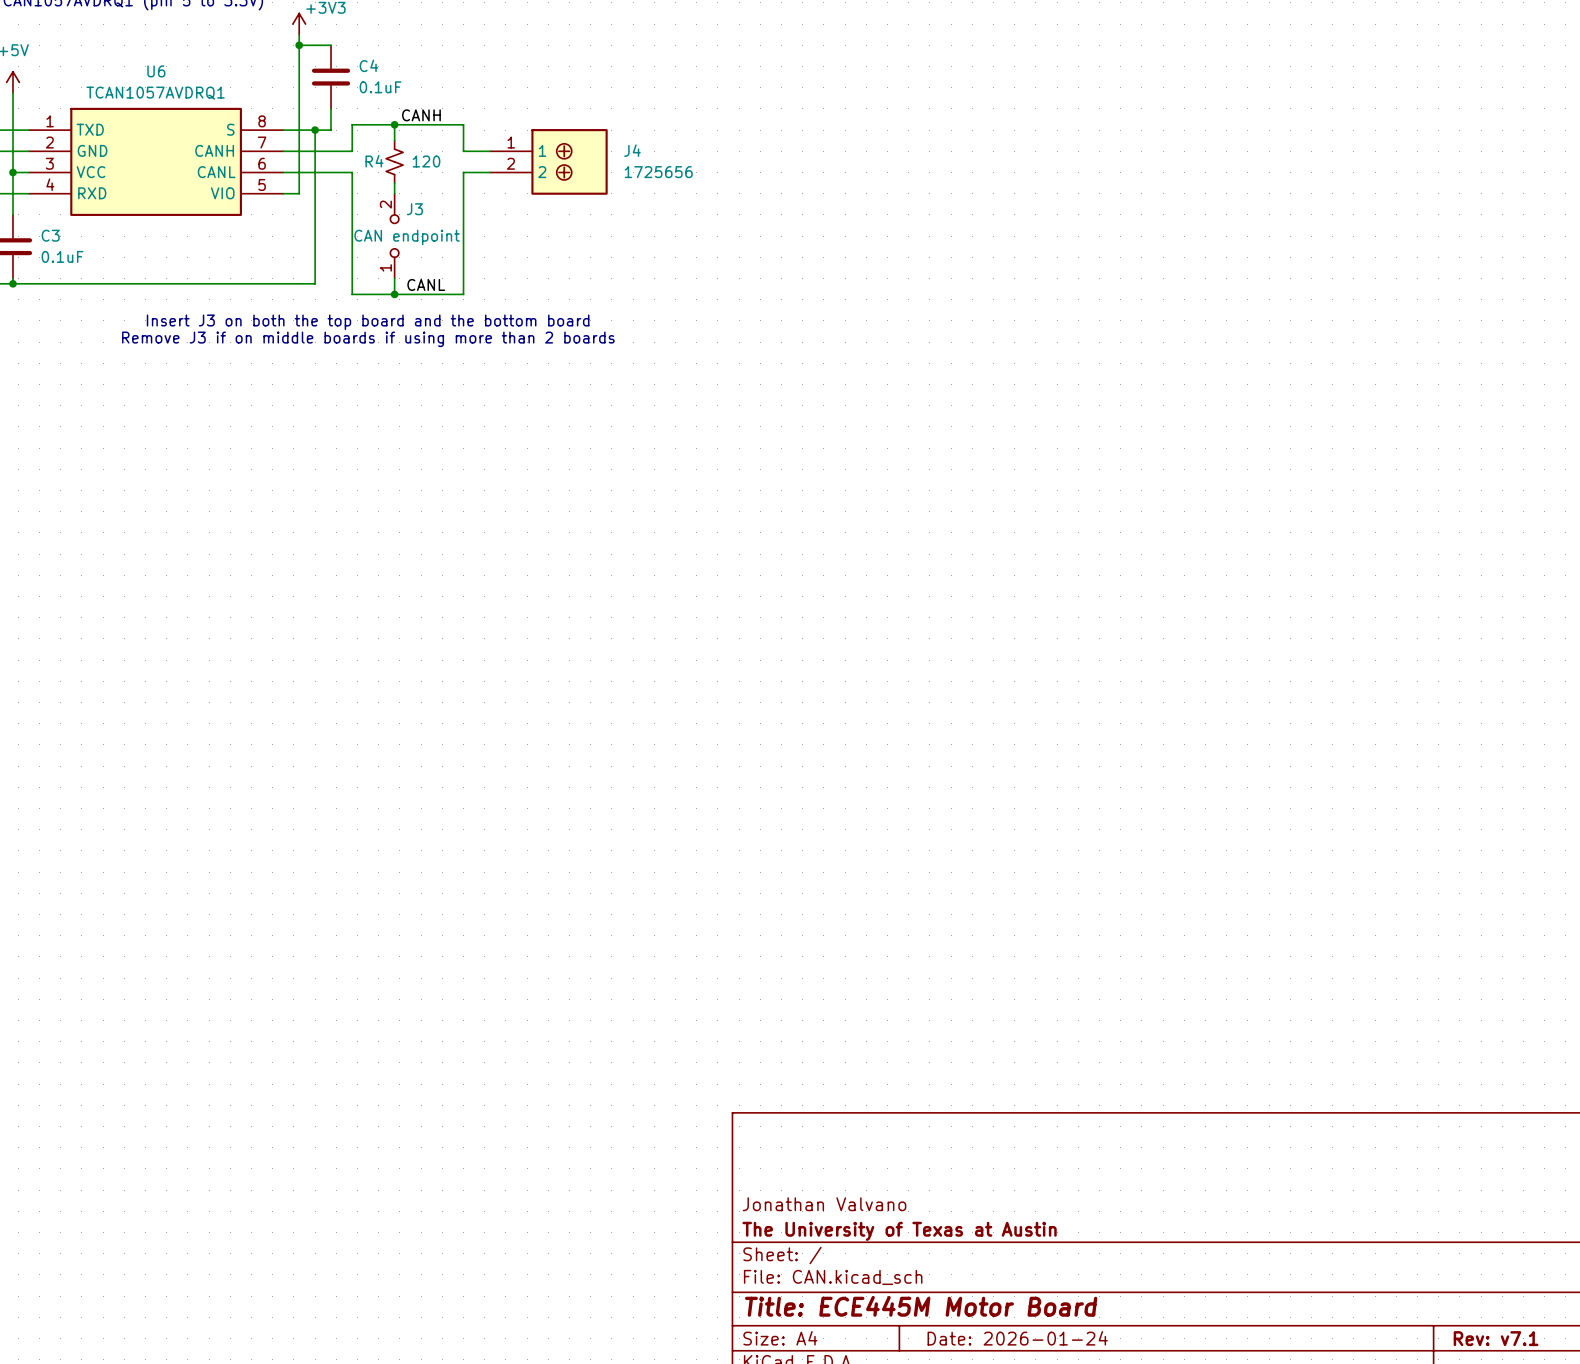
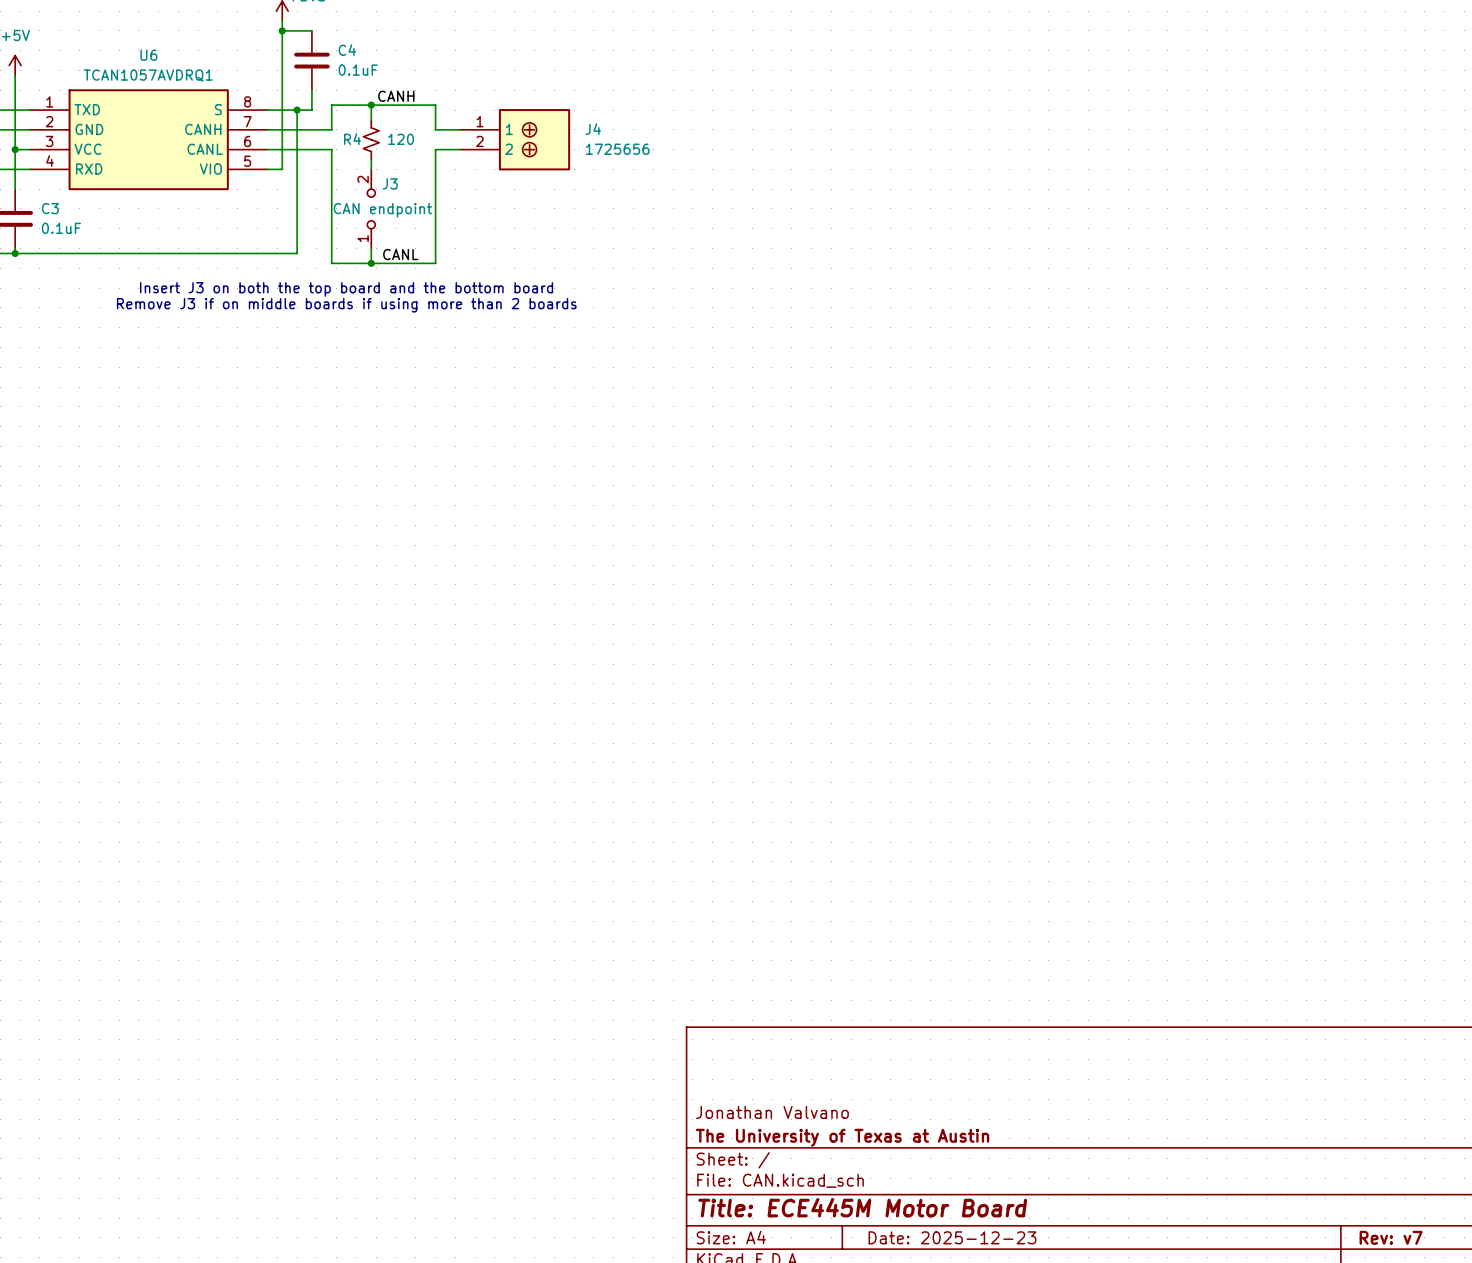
title block: Date: 2026-01-24 (1017, 1338) -> Date: 2025-12-23 (952, 1237)
title block: Rev: v7.1 (1496, 1338) -> Rev: v7 (1391, 1237)

